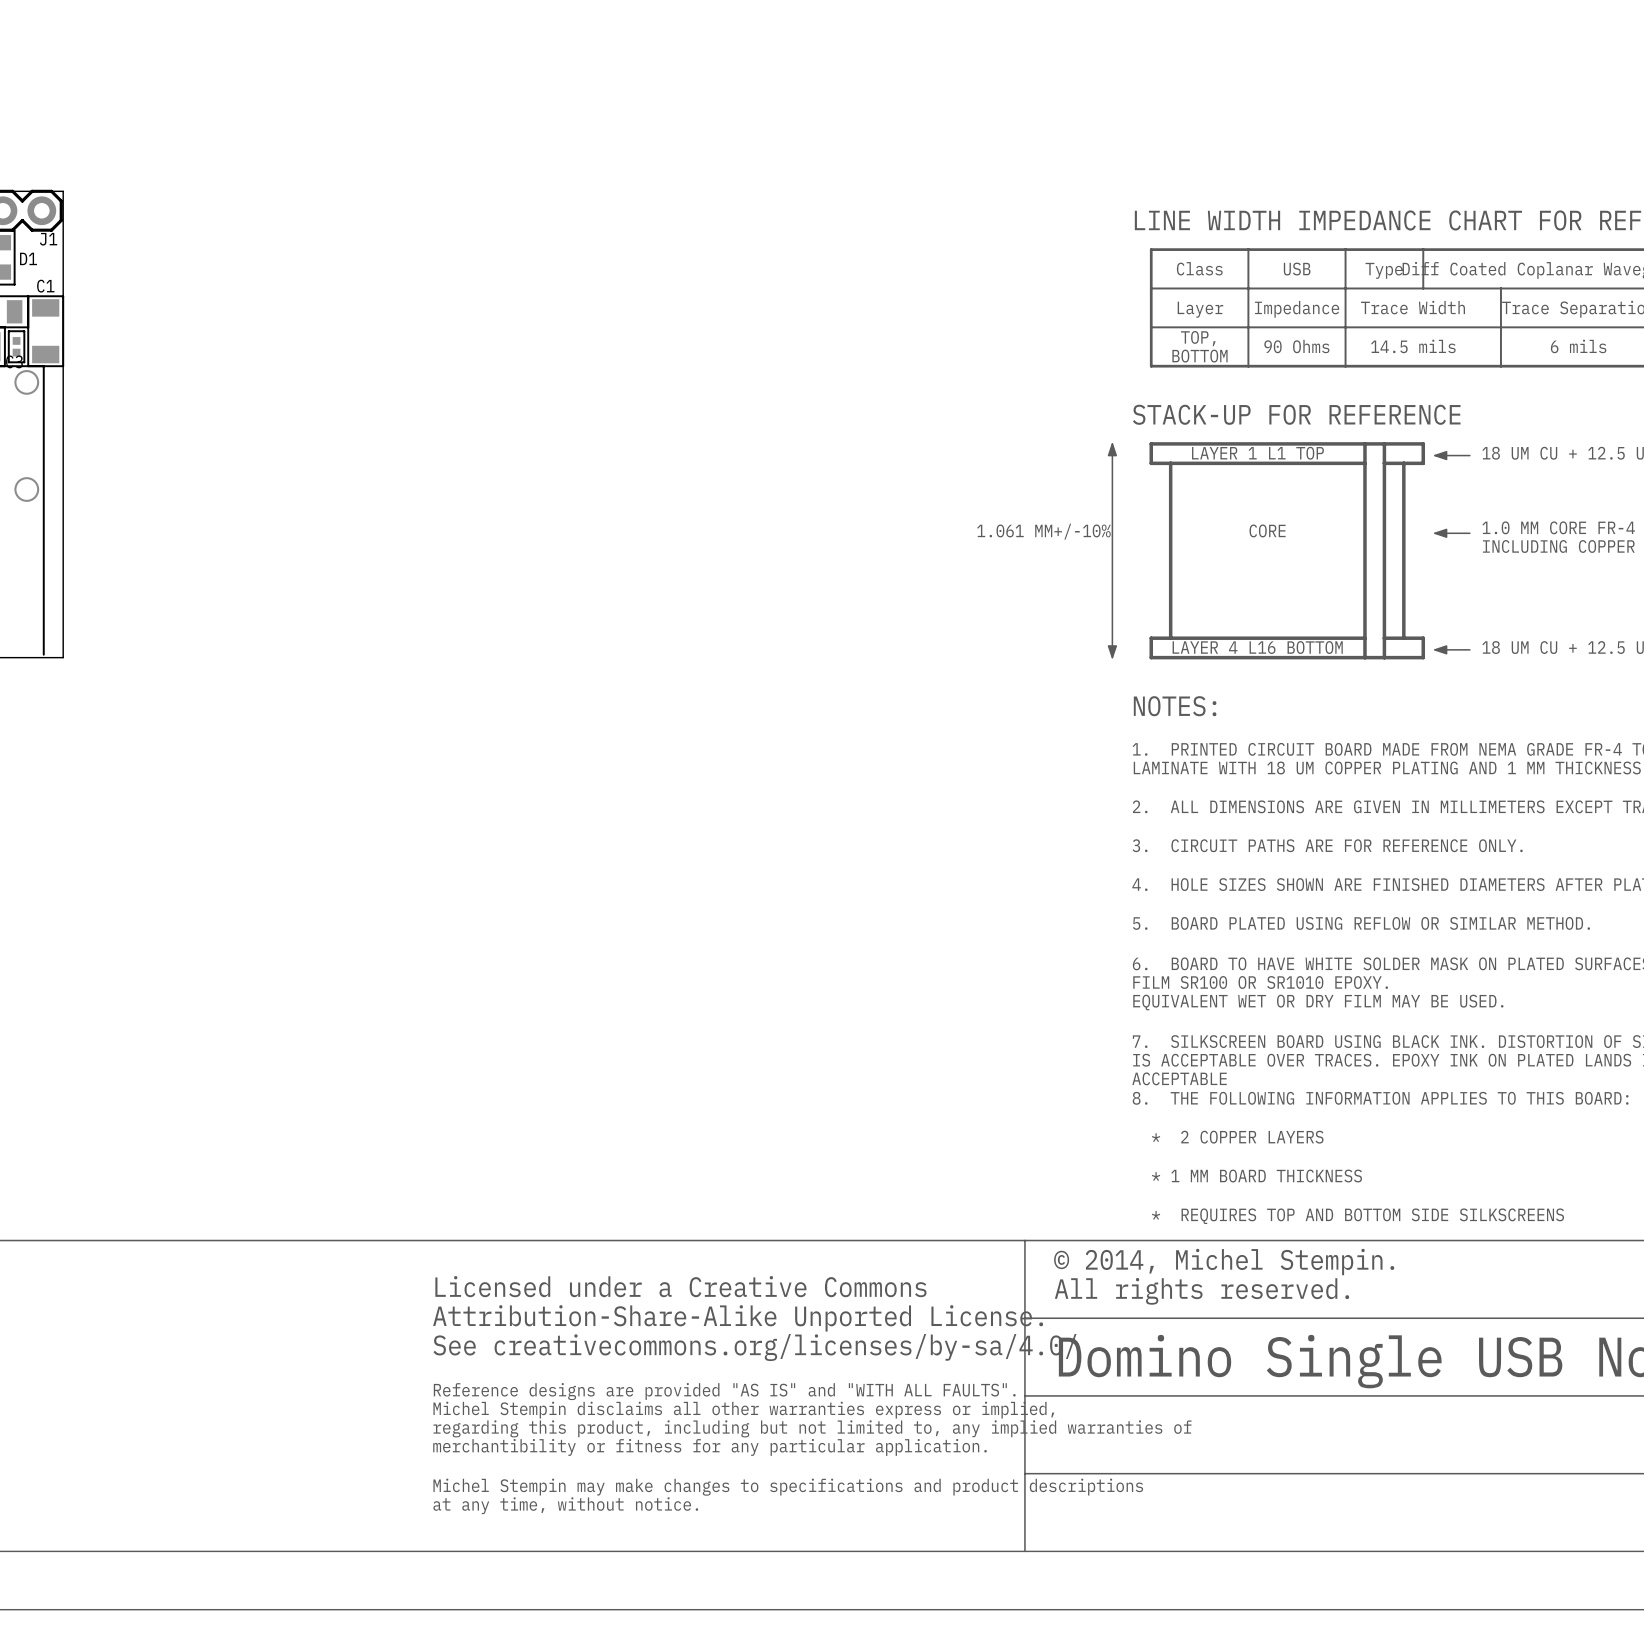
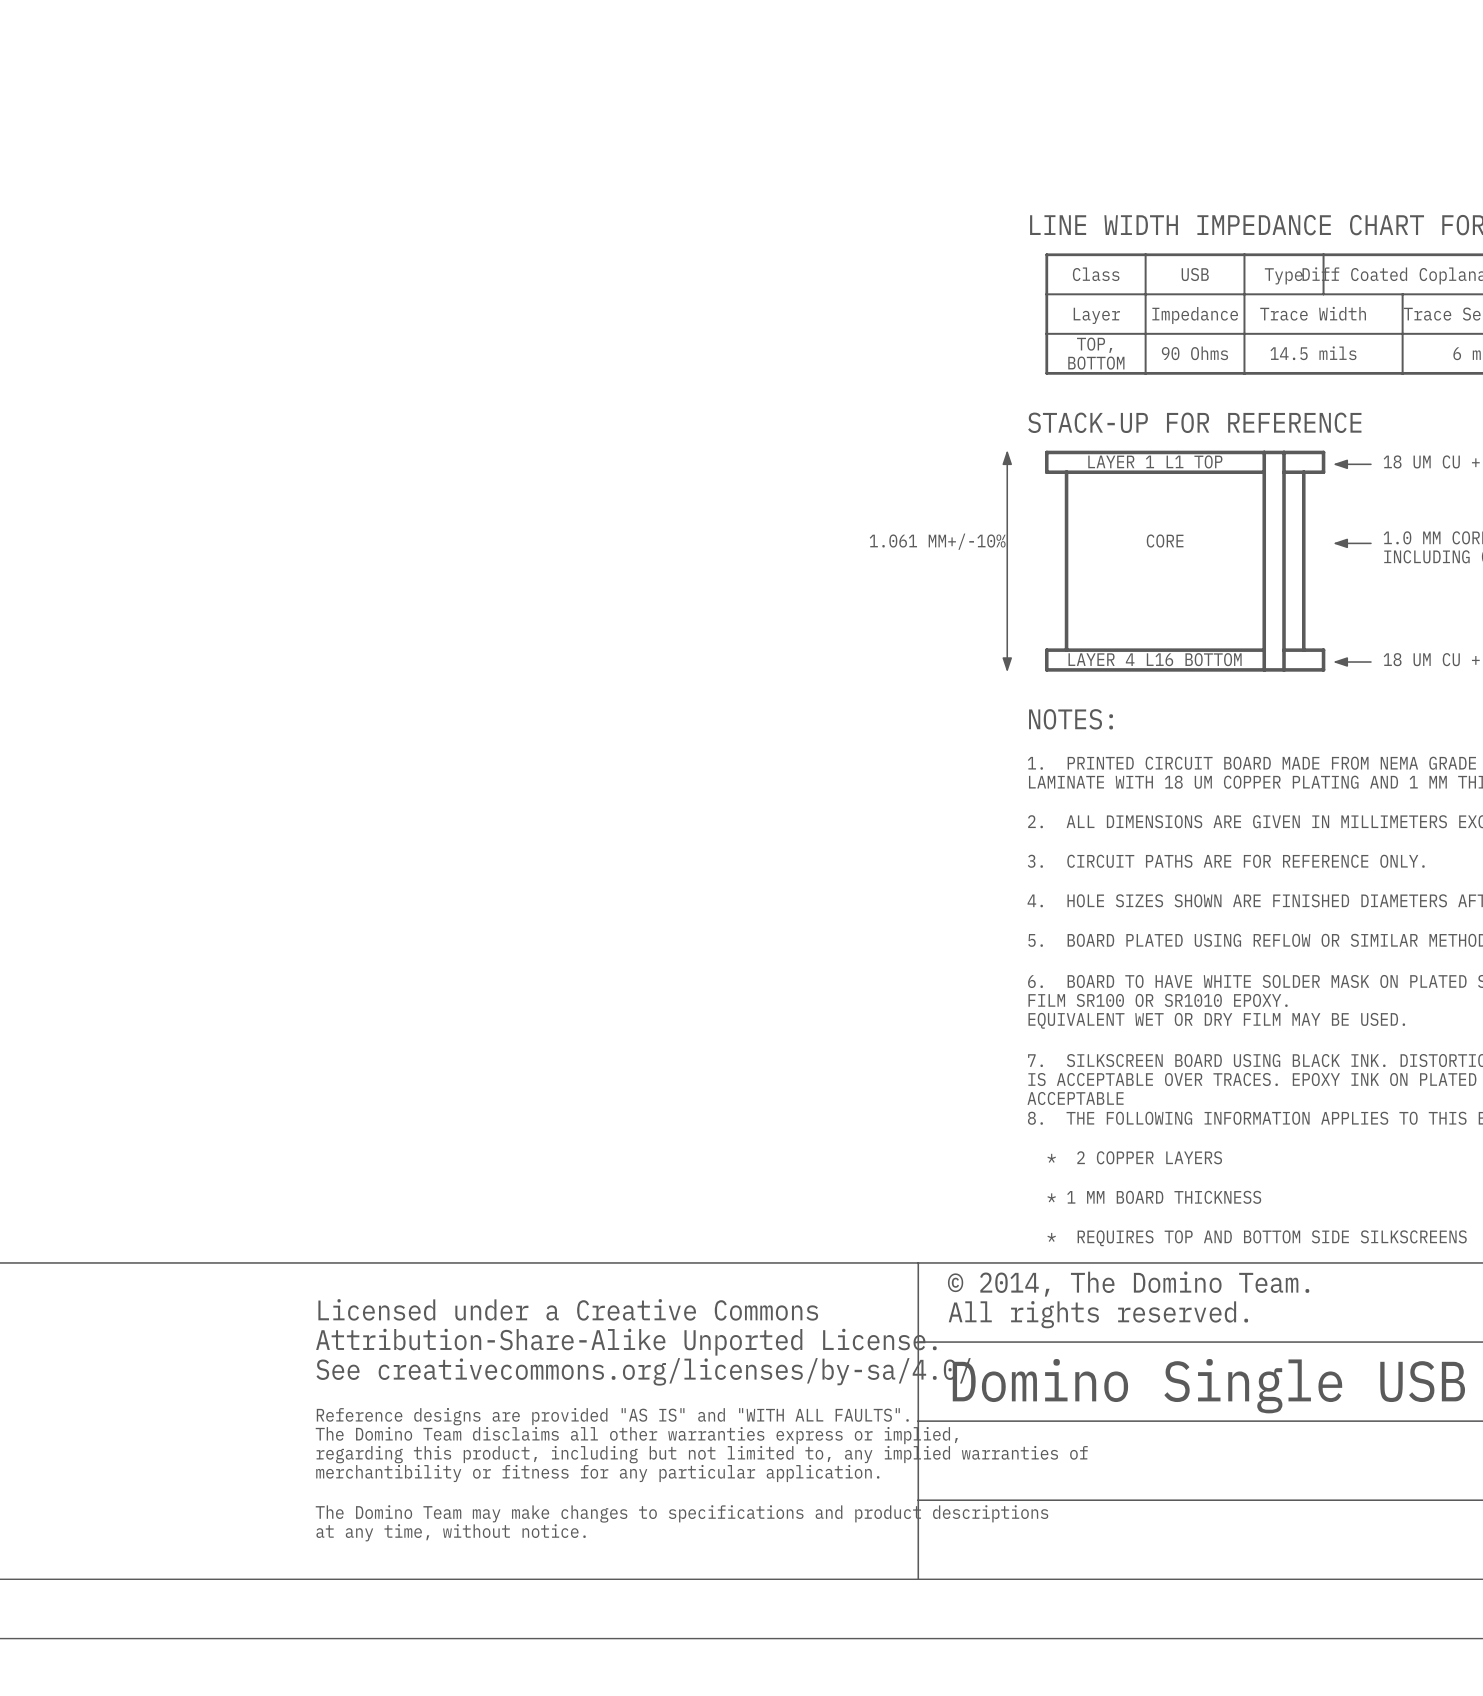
text: © 2014, Michel Stempin. (1224, 1262) -> © 2014, The Domino Team. (1128, 1284)
text: Michel Stempin disclaims all other warranties express or implied, (743, 1410) -> The Domino Team disclaims all other warranties express or implied, (636, 1435)
text: Michel Stempin may make changes to specifications and product descriptions (788, 1487) -> The Domino Team may make changes to specifications and product descriptions (681, 1513)

